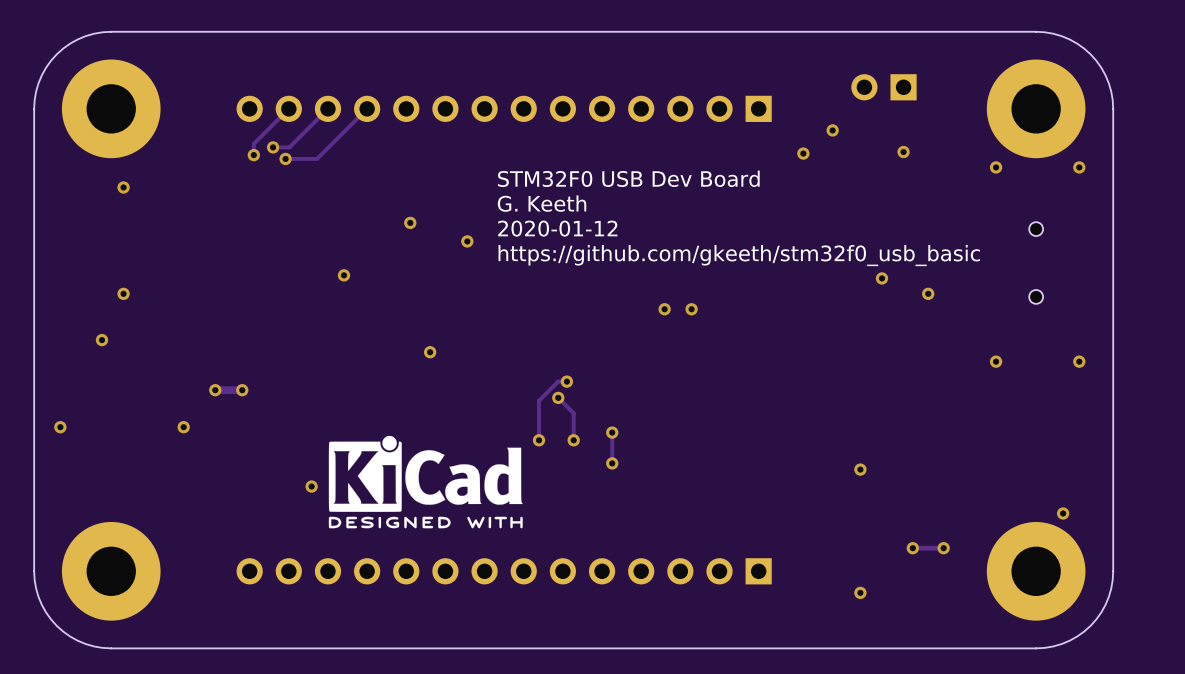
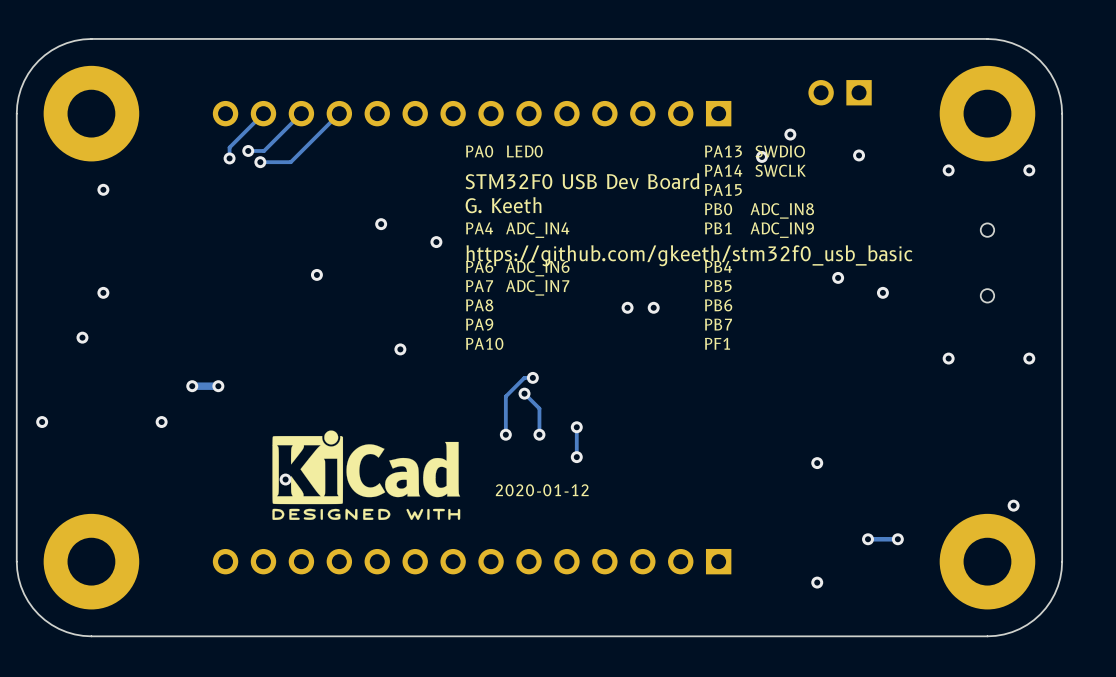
text: none -> PA0 LED0 (504, 151)
text: none -> PA13 SWDIO (754, 151)
text: none -> PA14 SWCLK (755, 170)
text: none -> PA15 (723, 189)
text: none -> PB0 ADC_IN8 (759, 210)
text: 2020-01-12 (557, 228) -> PA4 ADC_IN4 (517, 230)
text: none -> PB1 ADC_IN9 (759, 230)
text: none -> PB4 (718, 266)
text: none -> PA6 ADC_IN6 (517, 268)
text: none -> PB5 (718, 286)
text: none -> PA7 ADC_IN7 (517, 287)
text: none -> PA8 (479, 305)
text: none -> PB6 (718, 305)
text: none -> PA9 (479, 324)
text: none -> PB7 (718, 324)
text: none -> PA10 (484, 343)
text: none -> PF1 (717, 343)
drawing position: (425, 482) -> (366, 475)
text: none -> 2020-01-12 (542, 490)

